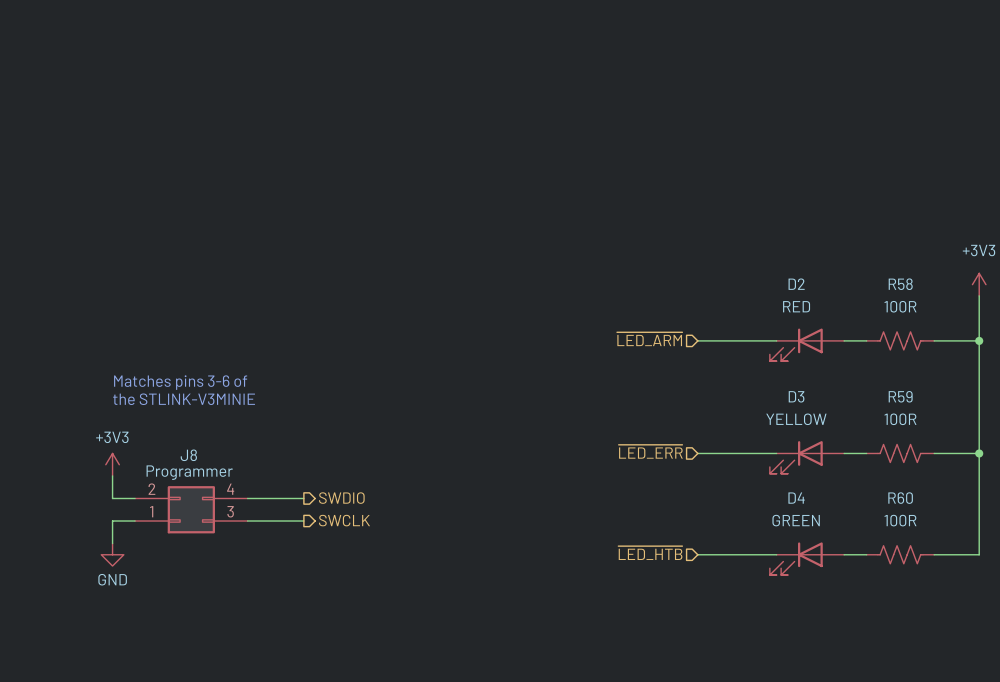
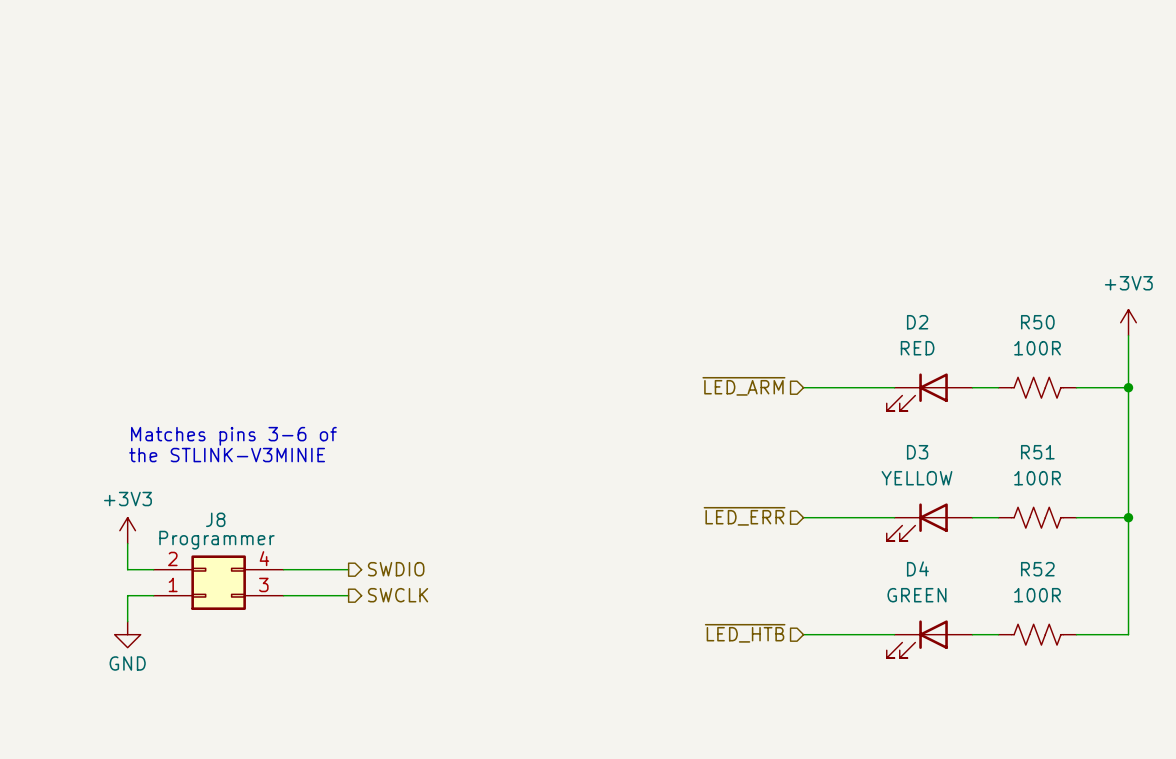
R58 name: R58 (900, 284) -> R50 (1037, 322)
R59 name: R59 (900, 396) -> R51 (1037, 452)
R60 name: R60 (900, 498) -> R52 (1037, 569)

